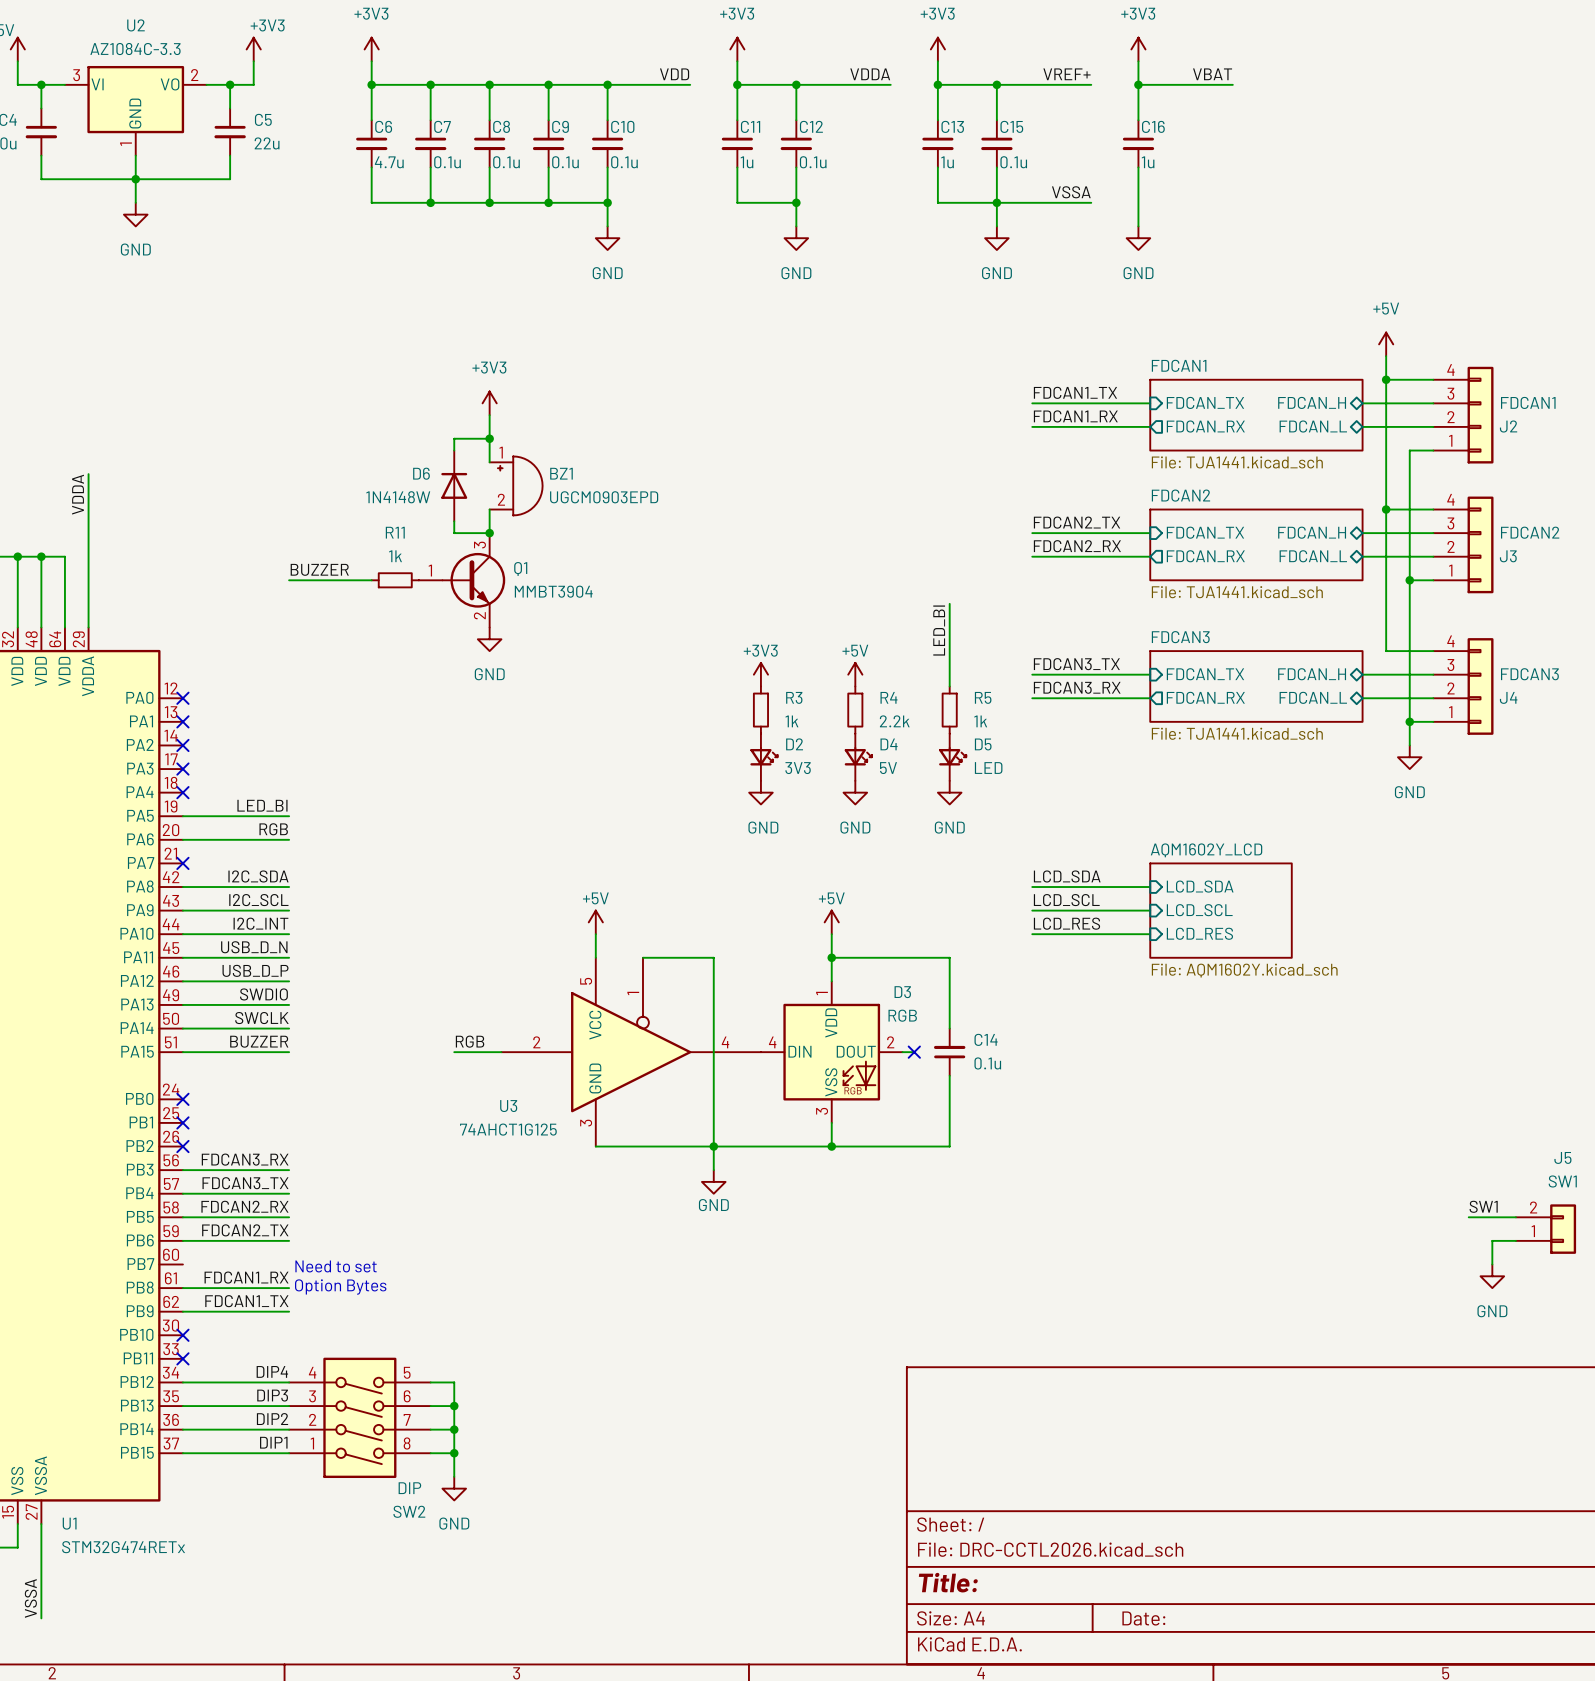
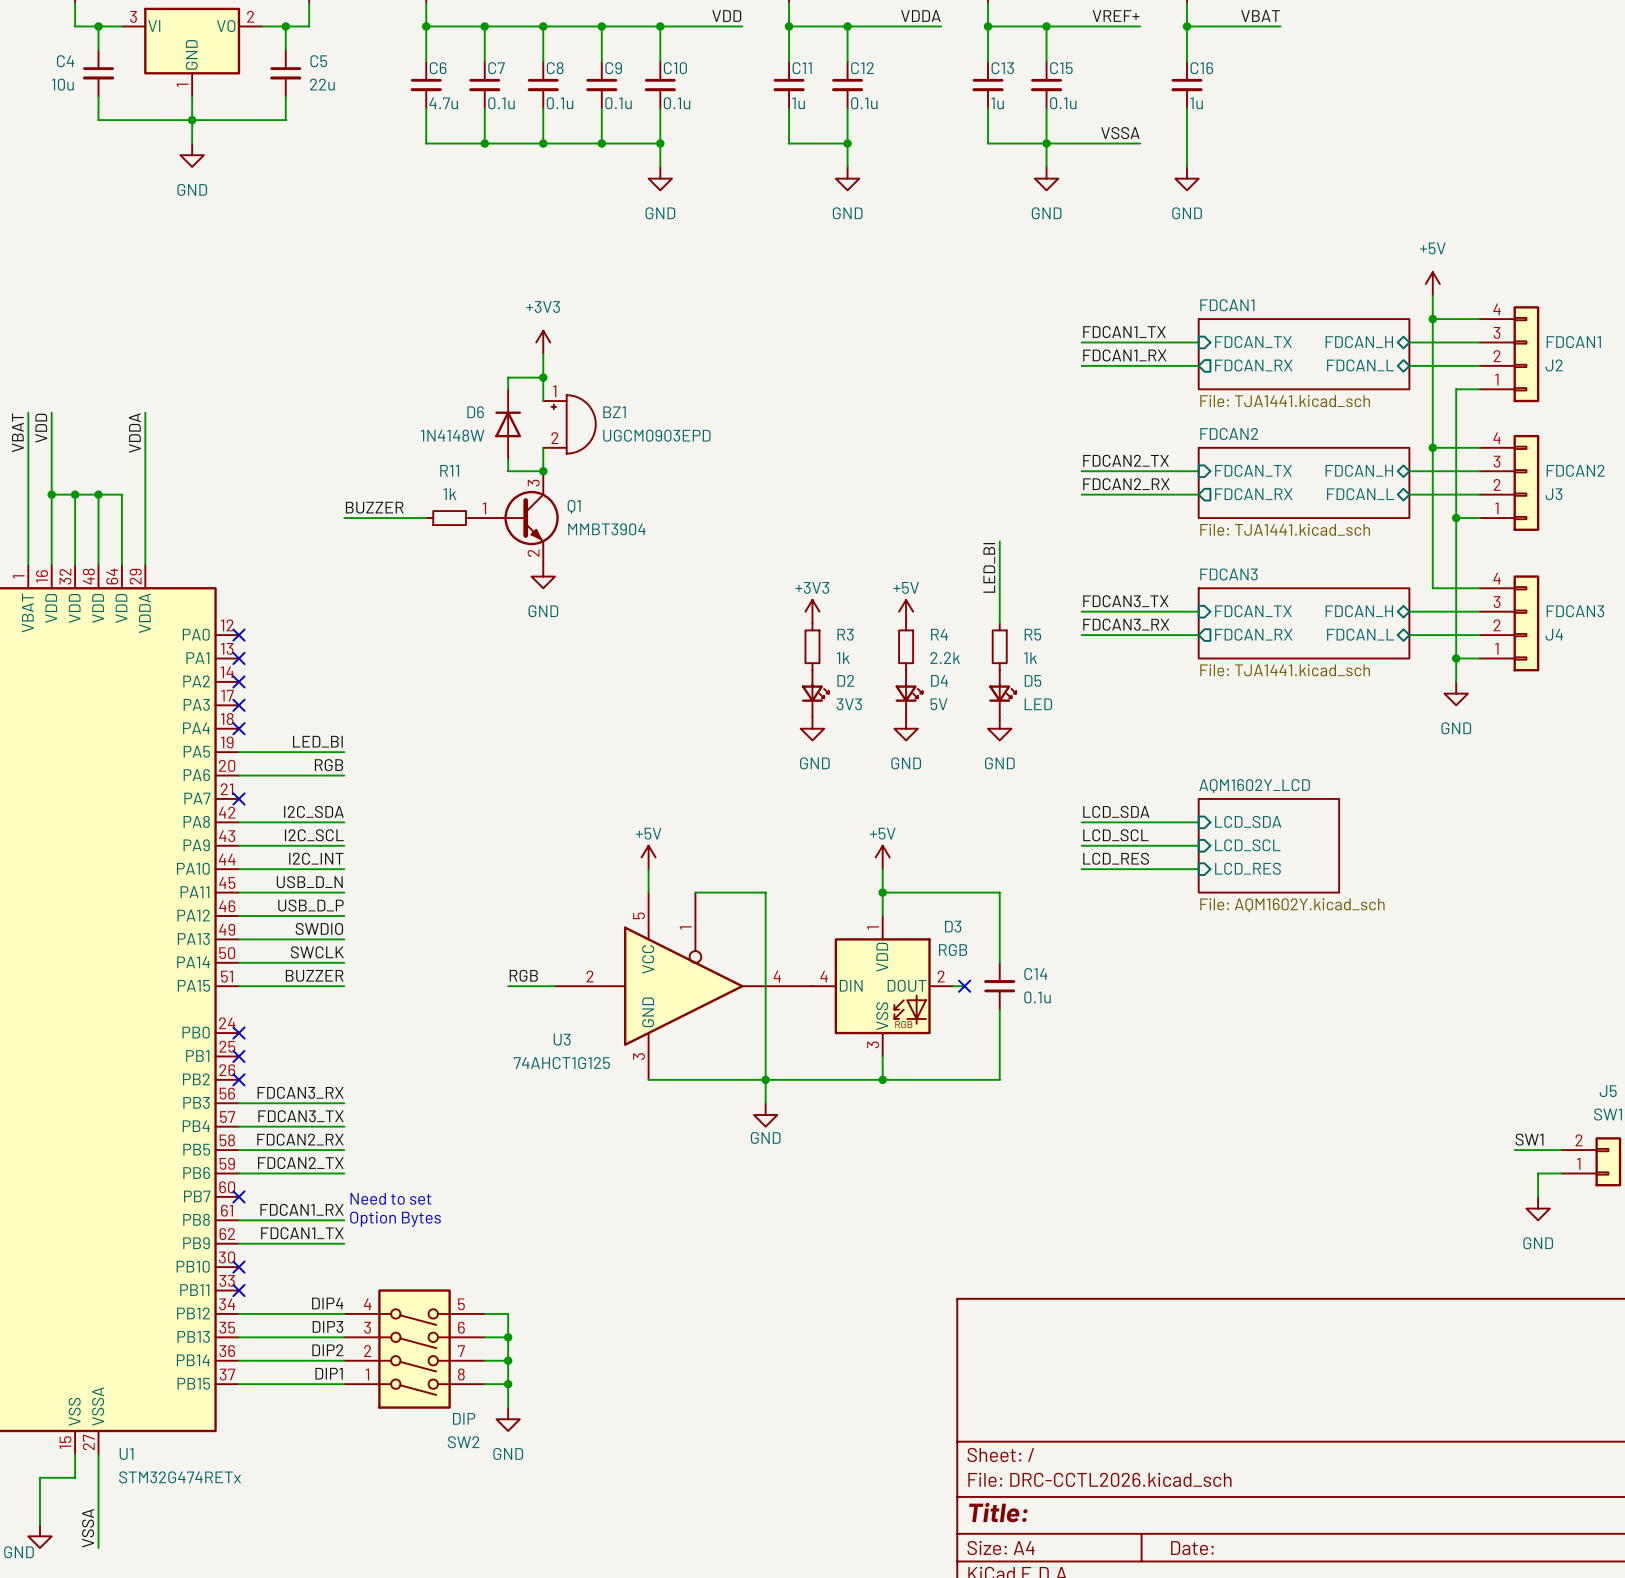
no-connect mark: none -> (238, 1196)

